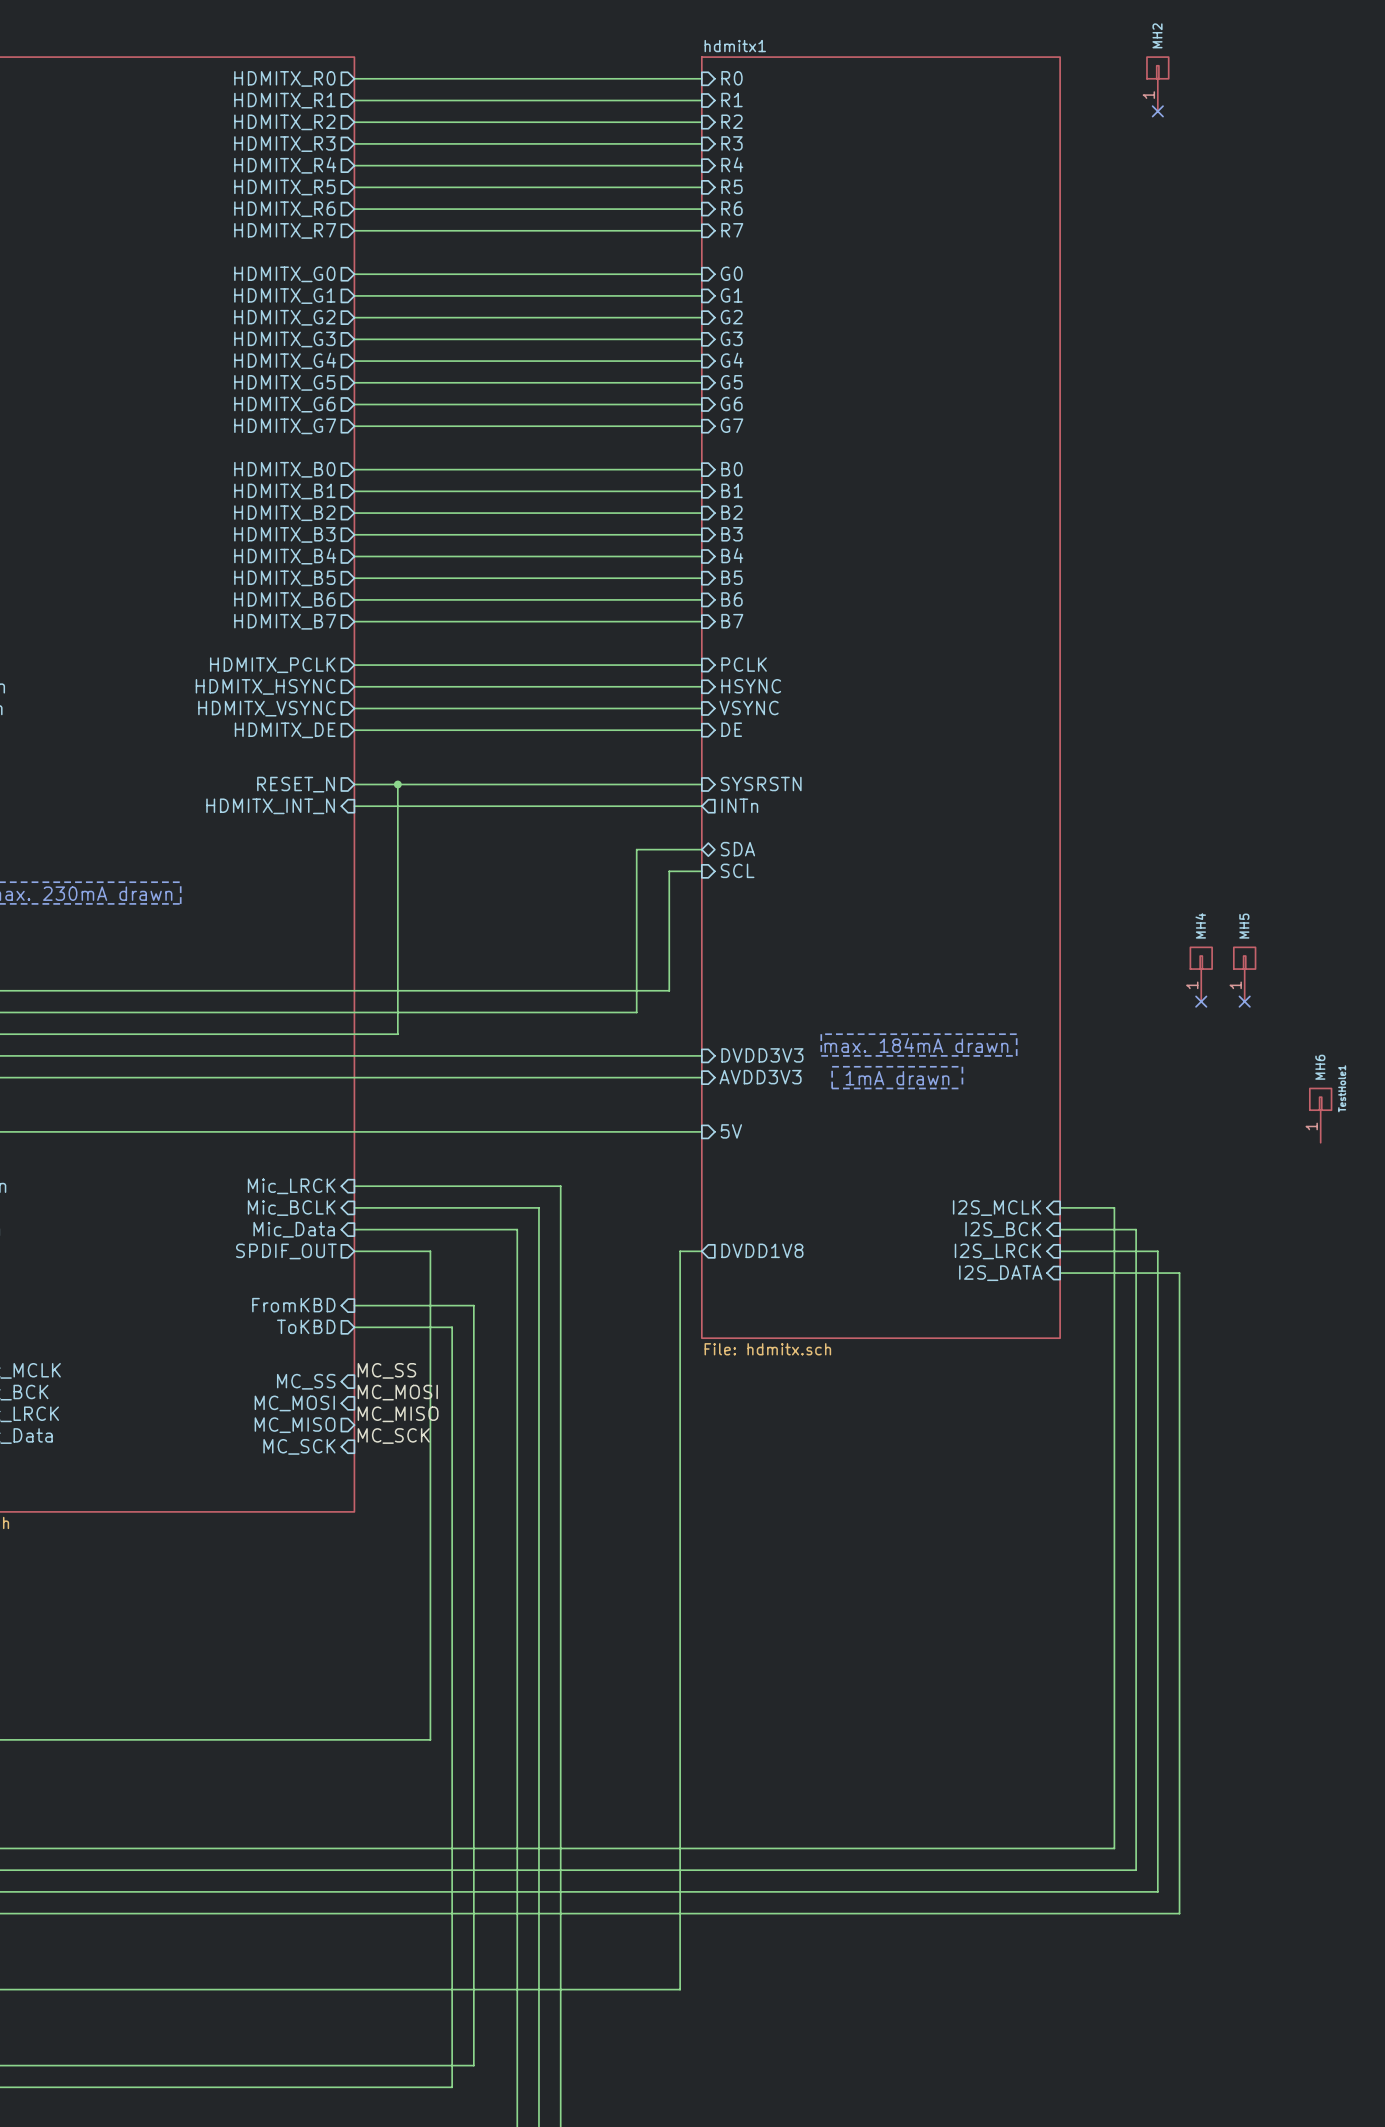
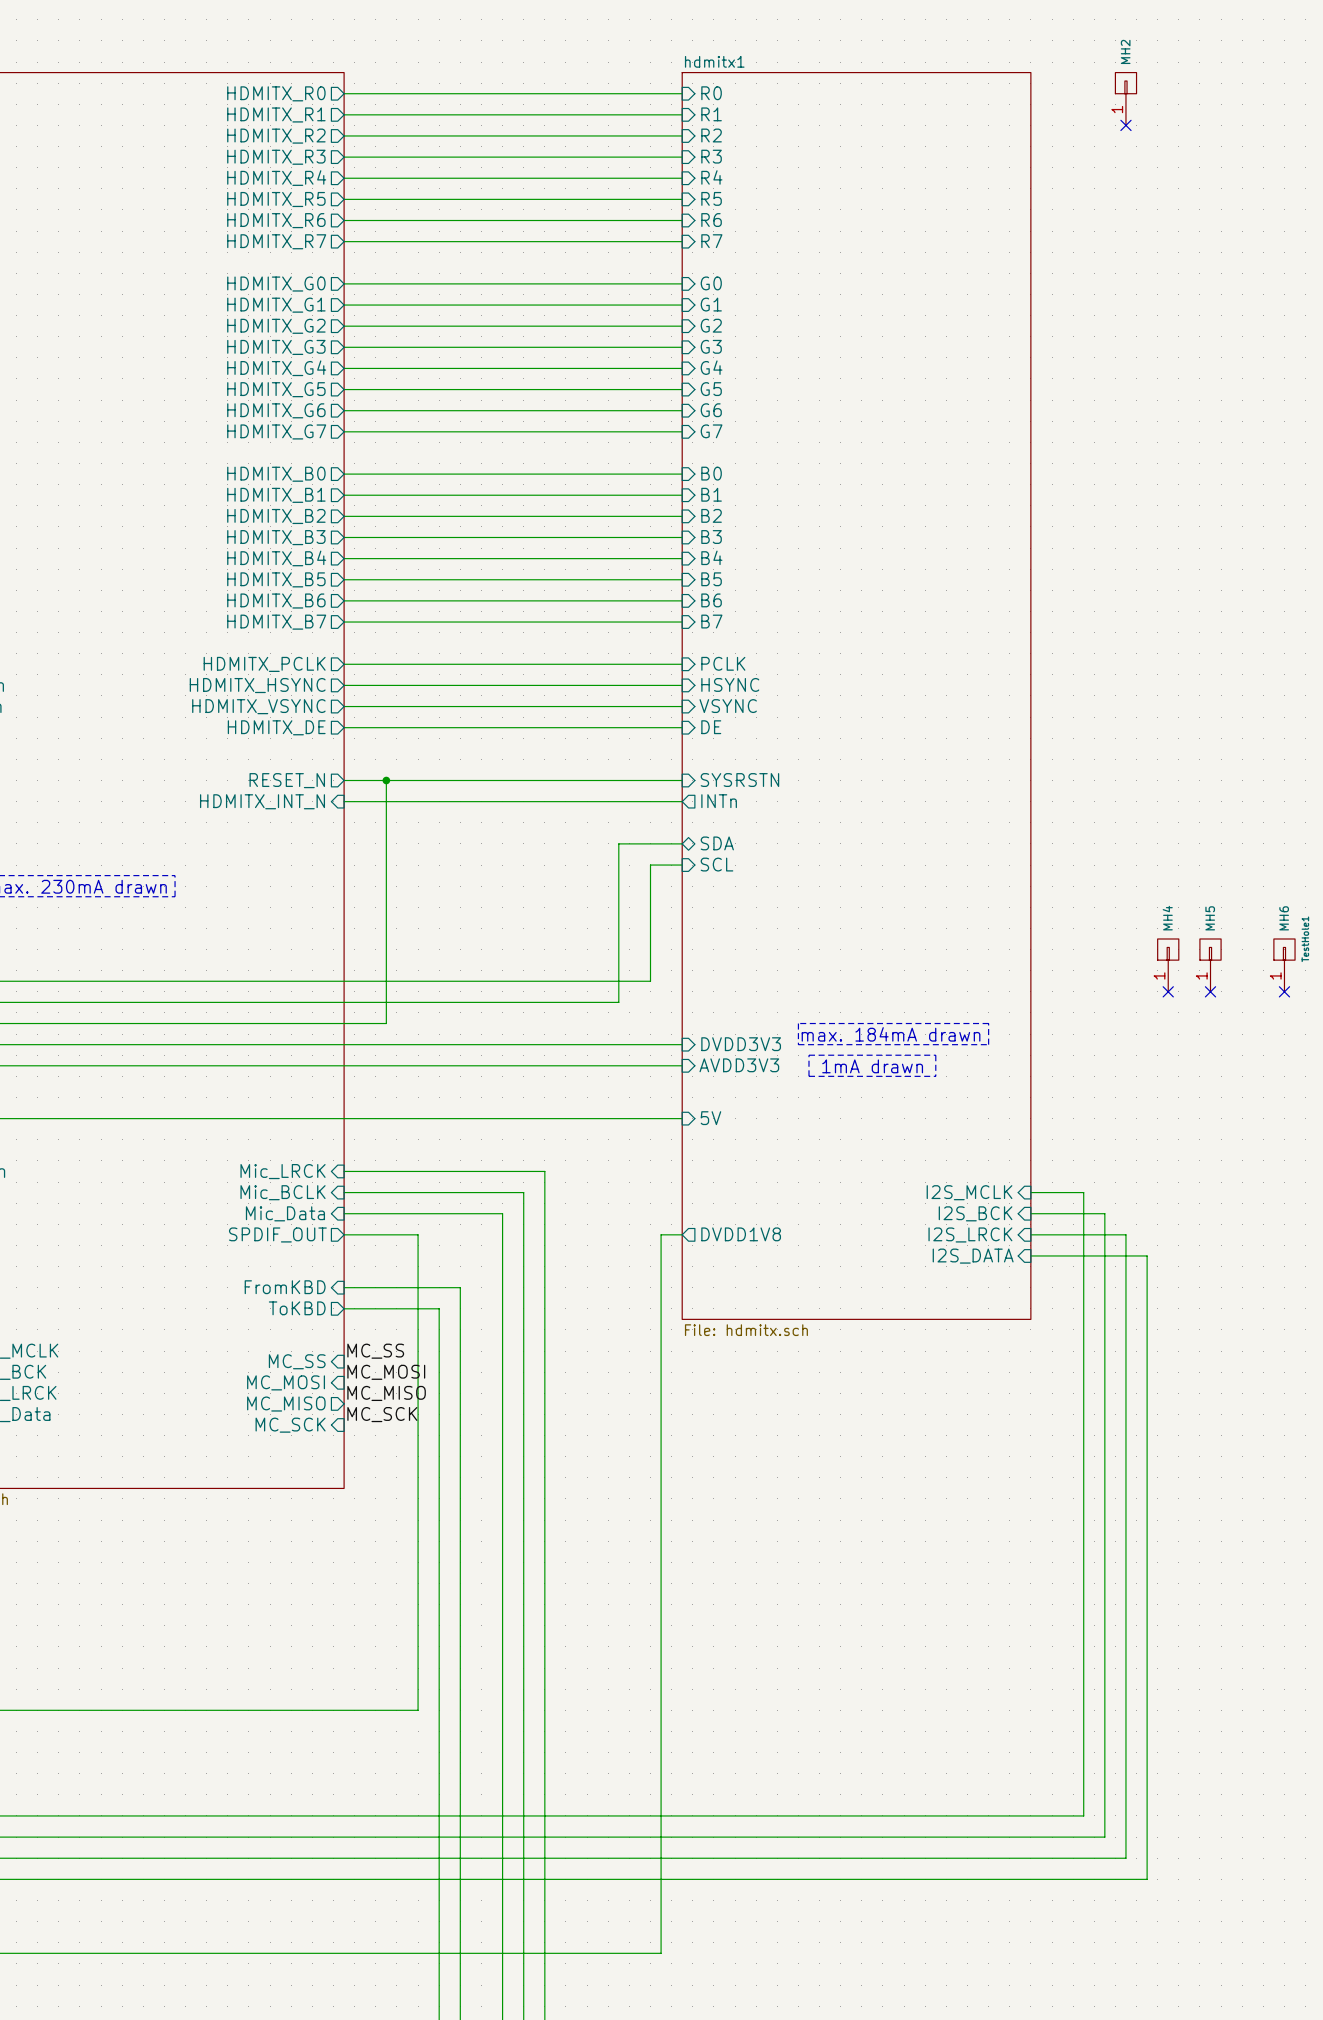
no-connect mark: none -> (1284, 991)
MH6 position: (1320, 1115) -> (1284, 965)

